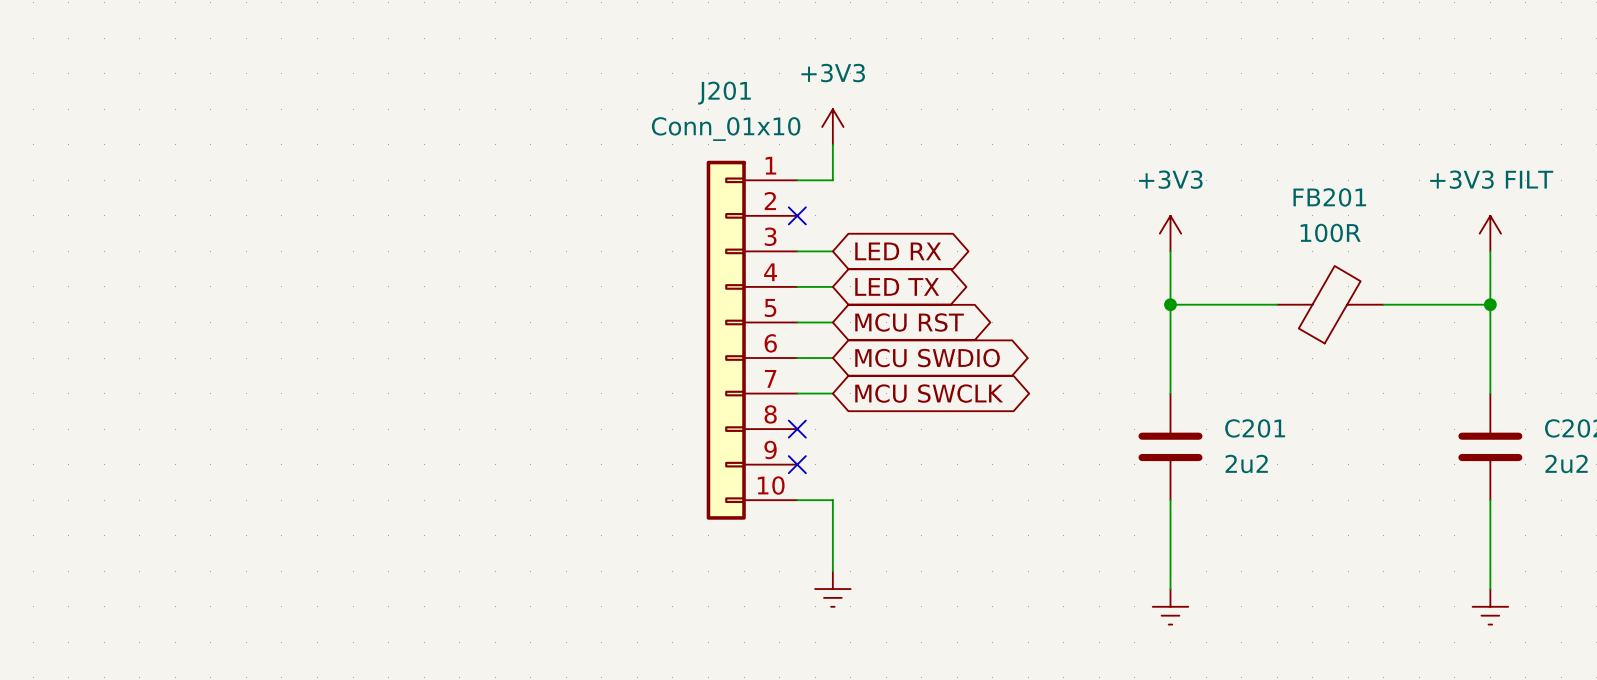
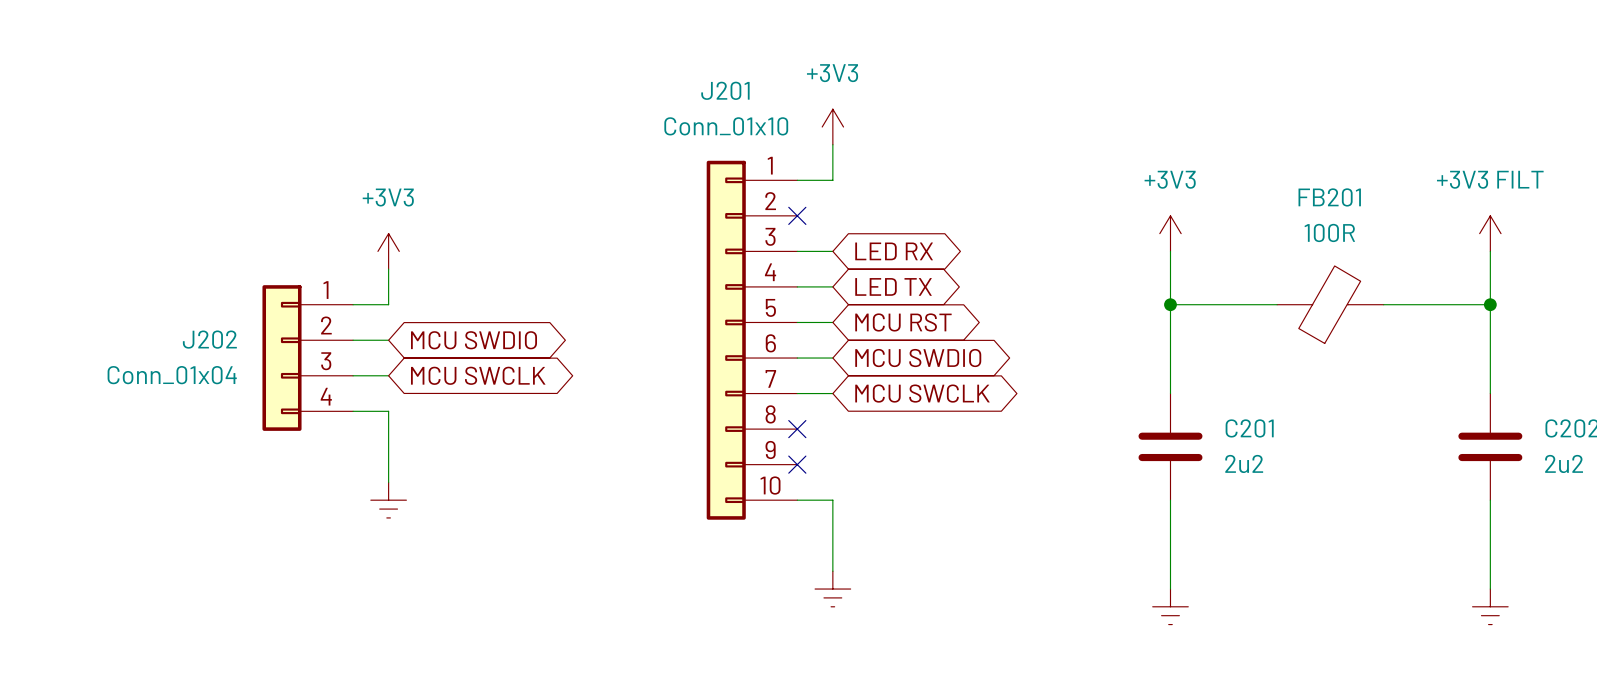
power symbol: none -> +3V3 (388, 251)
wire: none -> (388, 269) (388, 304) (353, 304)
wire: none -> (353, 340) (388, 340)
global label: none -> MCU SWDIO (474, 340)
J202: none -> Conn_01x04 (307, 358)
wire: none -> (353, 375) (388, 375)
global label: none -> MCU SWCLK (478, 375)
wire: none -> (353, 411) (388, 411) (388, 482)
power symbol: none -> (388, 500)

